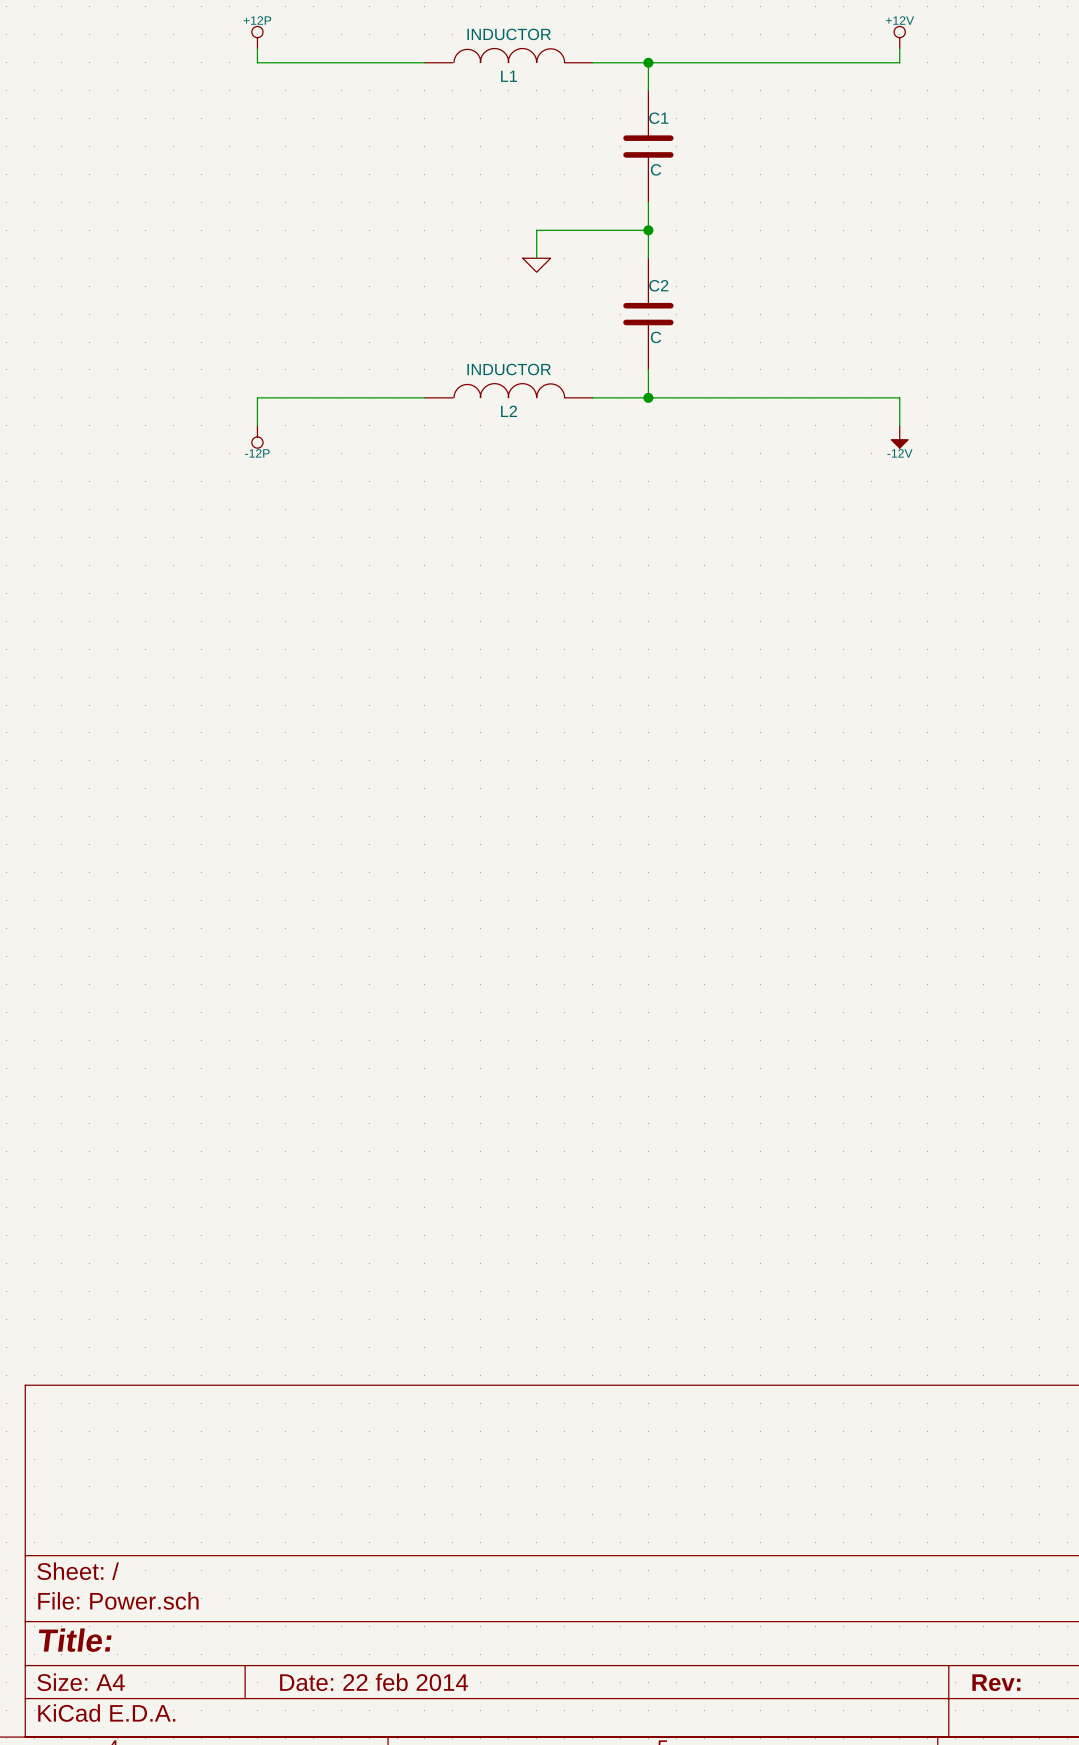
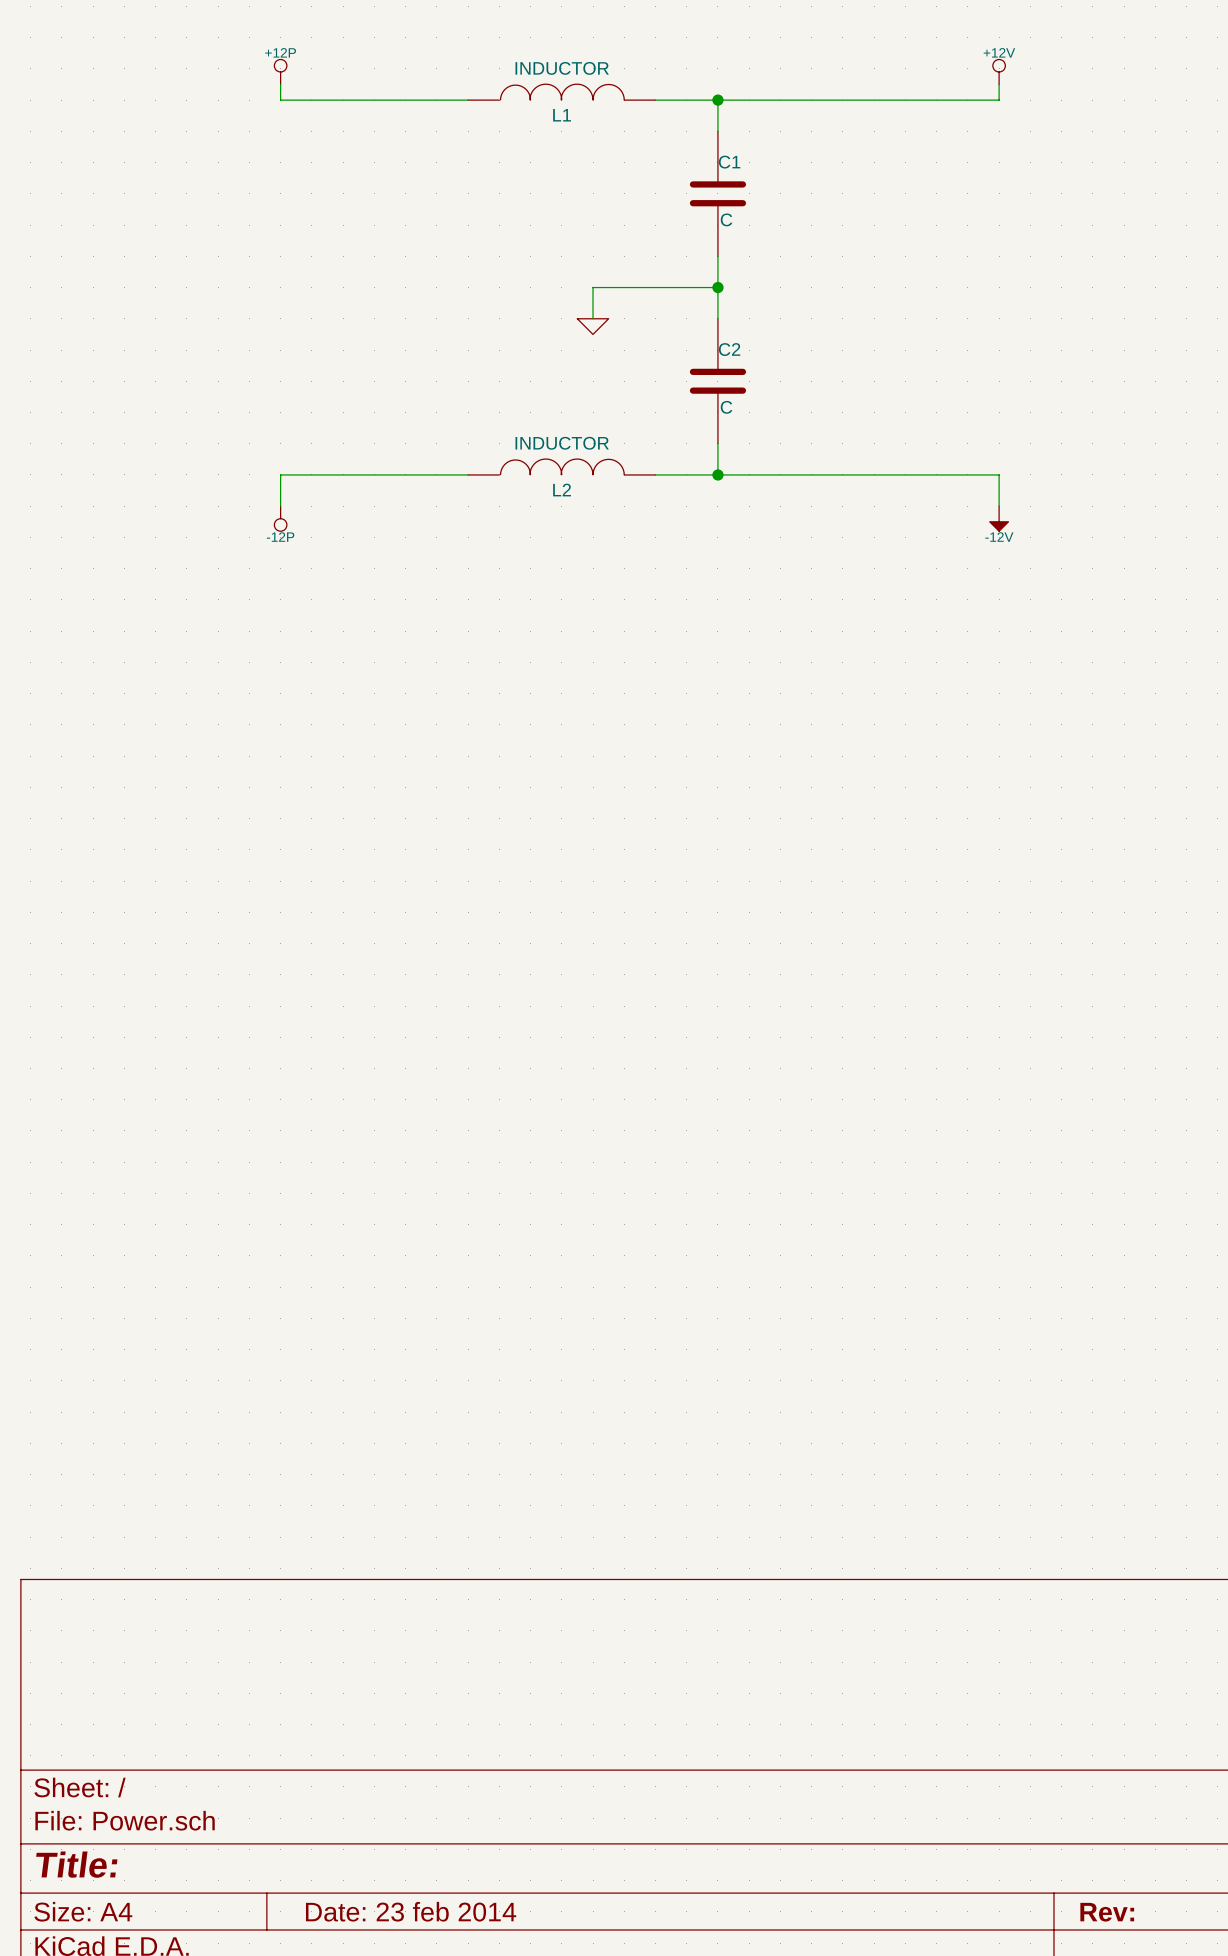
title block: Date: 22 feb 2014 (374, 1682) -> Date: 23 feb 2014 (411, 1911)

